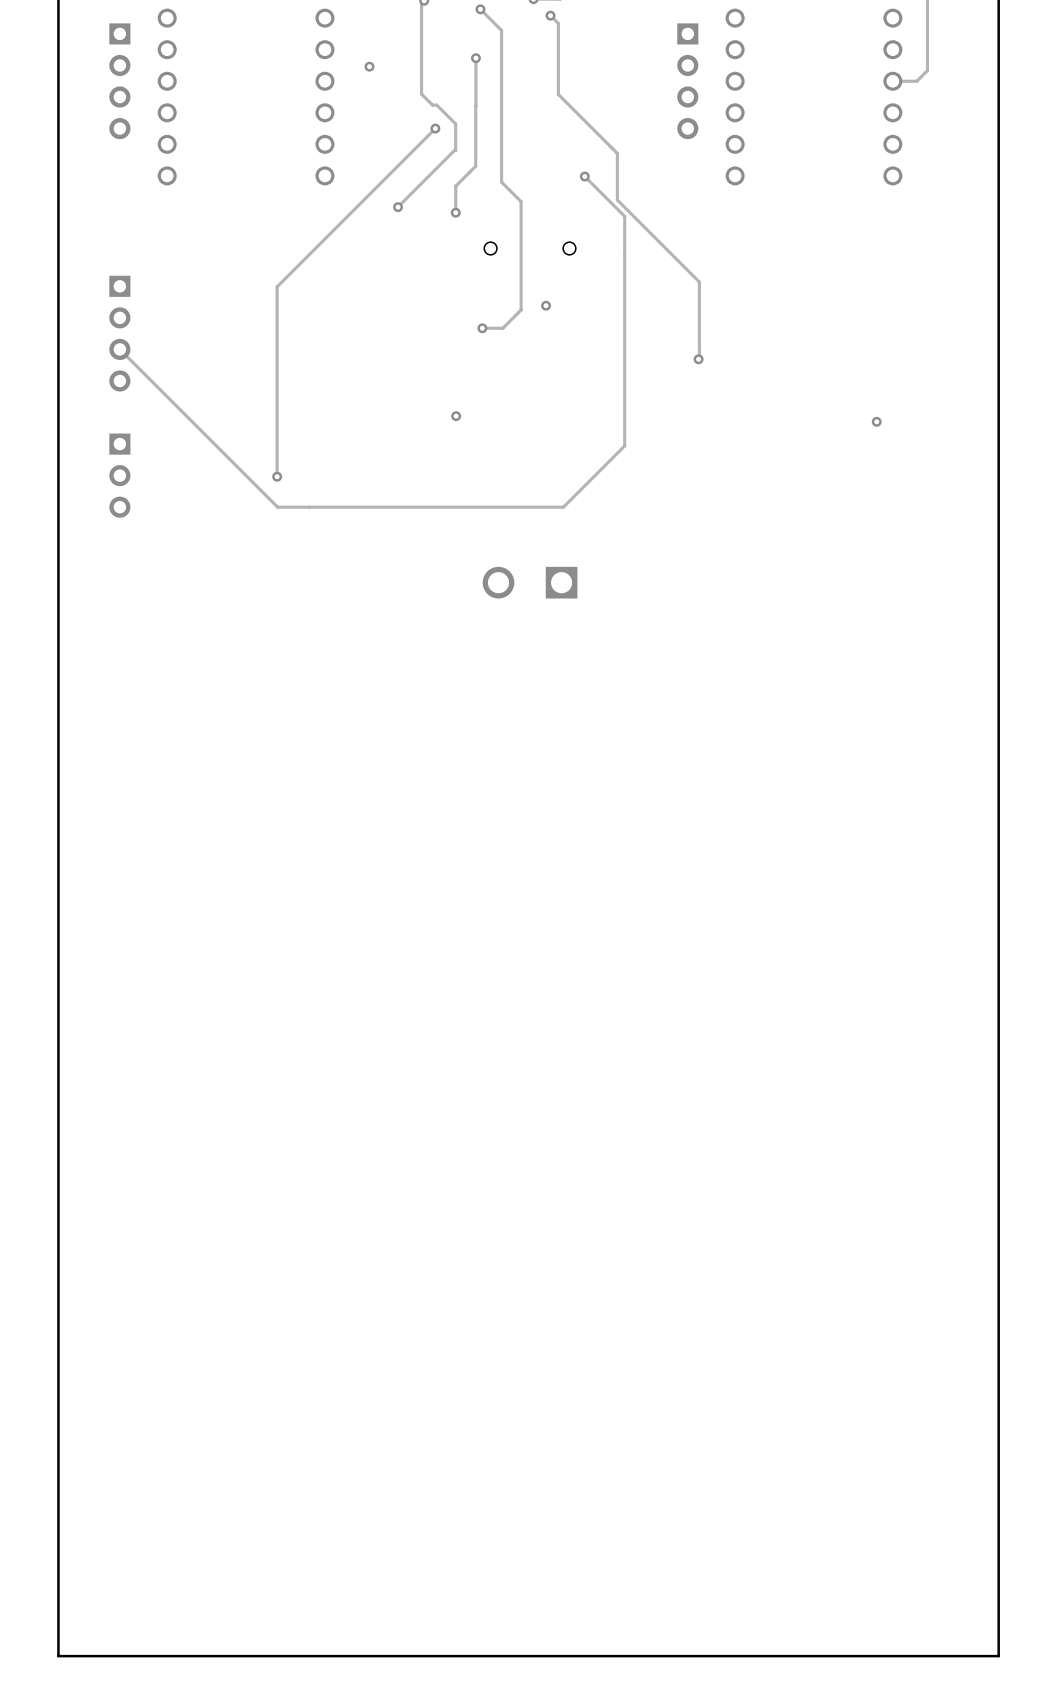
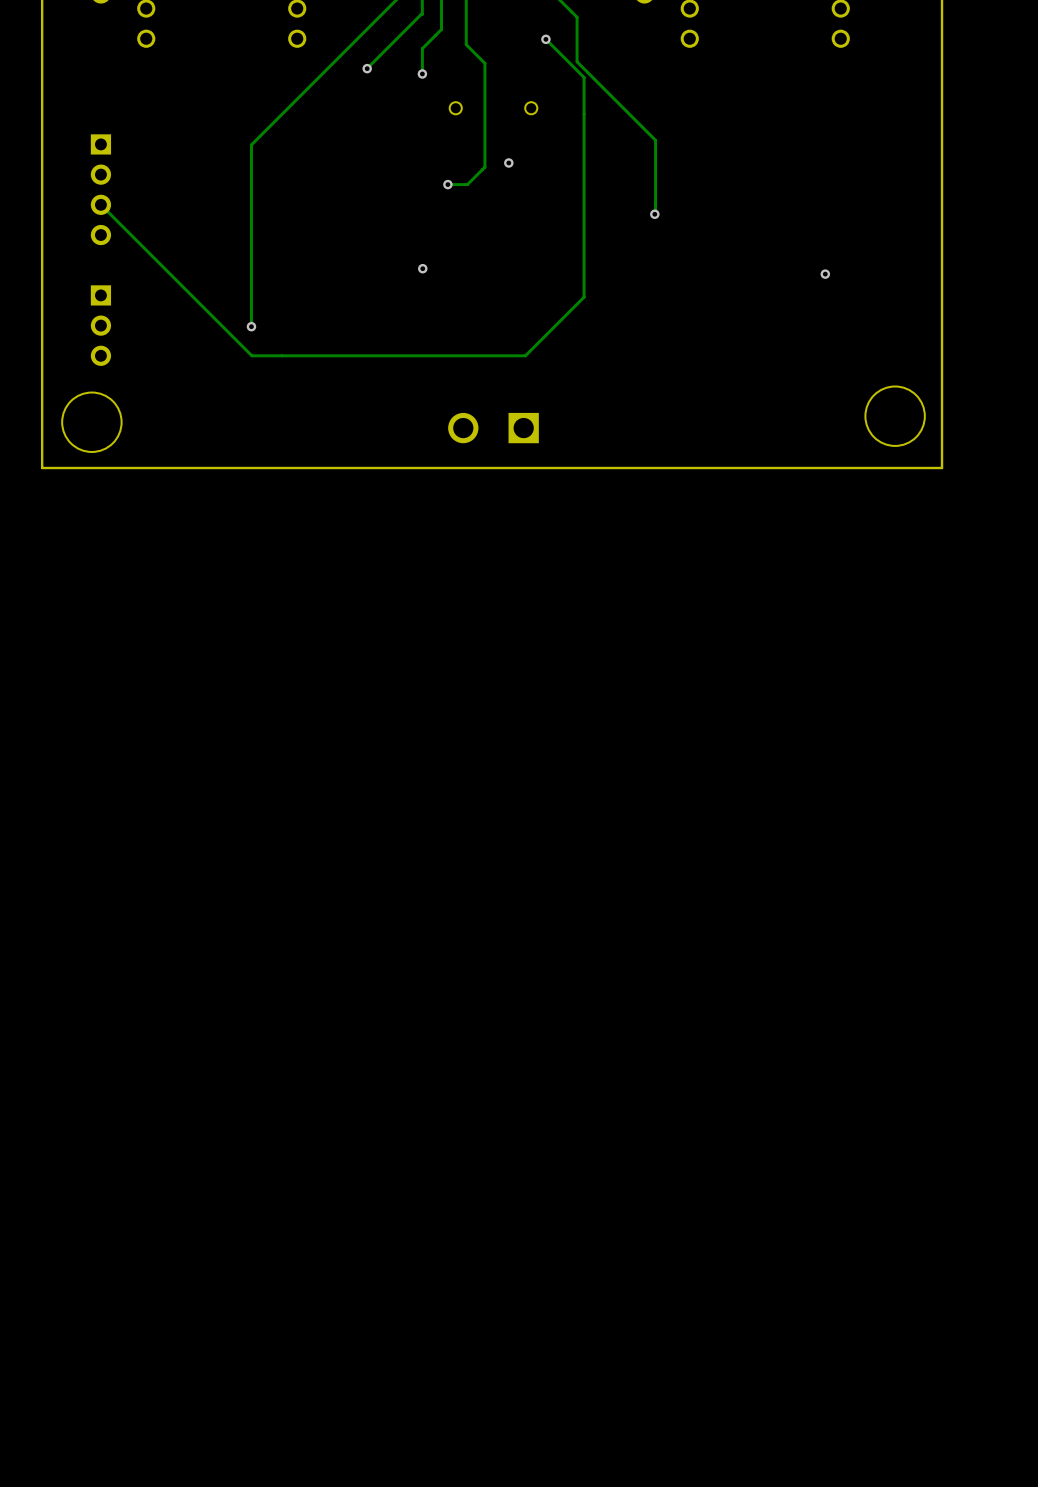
round board edge: none -> [864, 385, 926, 447]
round board edge: none -> [61, 391, 123, 453]
board edge: (998, 624) (998, 1656) (58, 1656) (58, 624) -> (942, 468) (42, 468)

